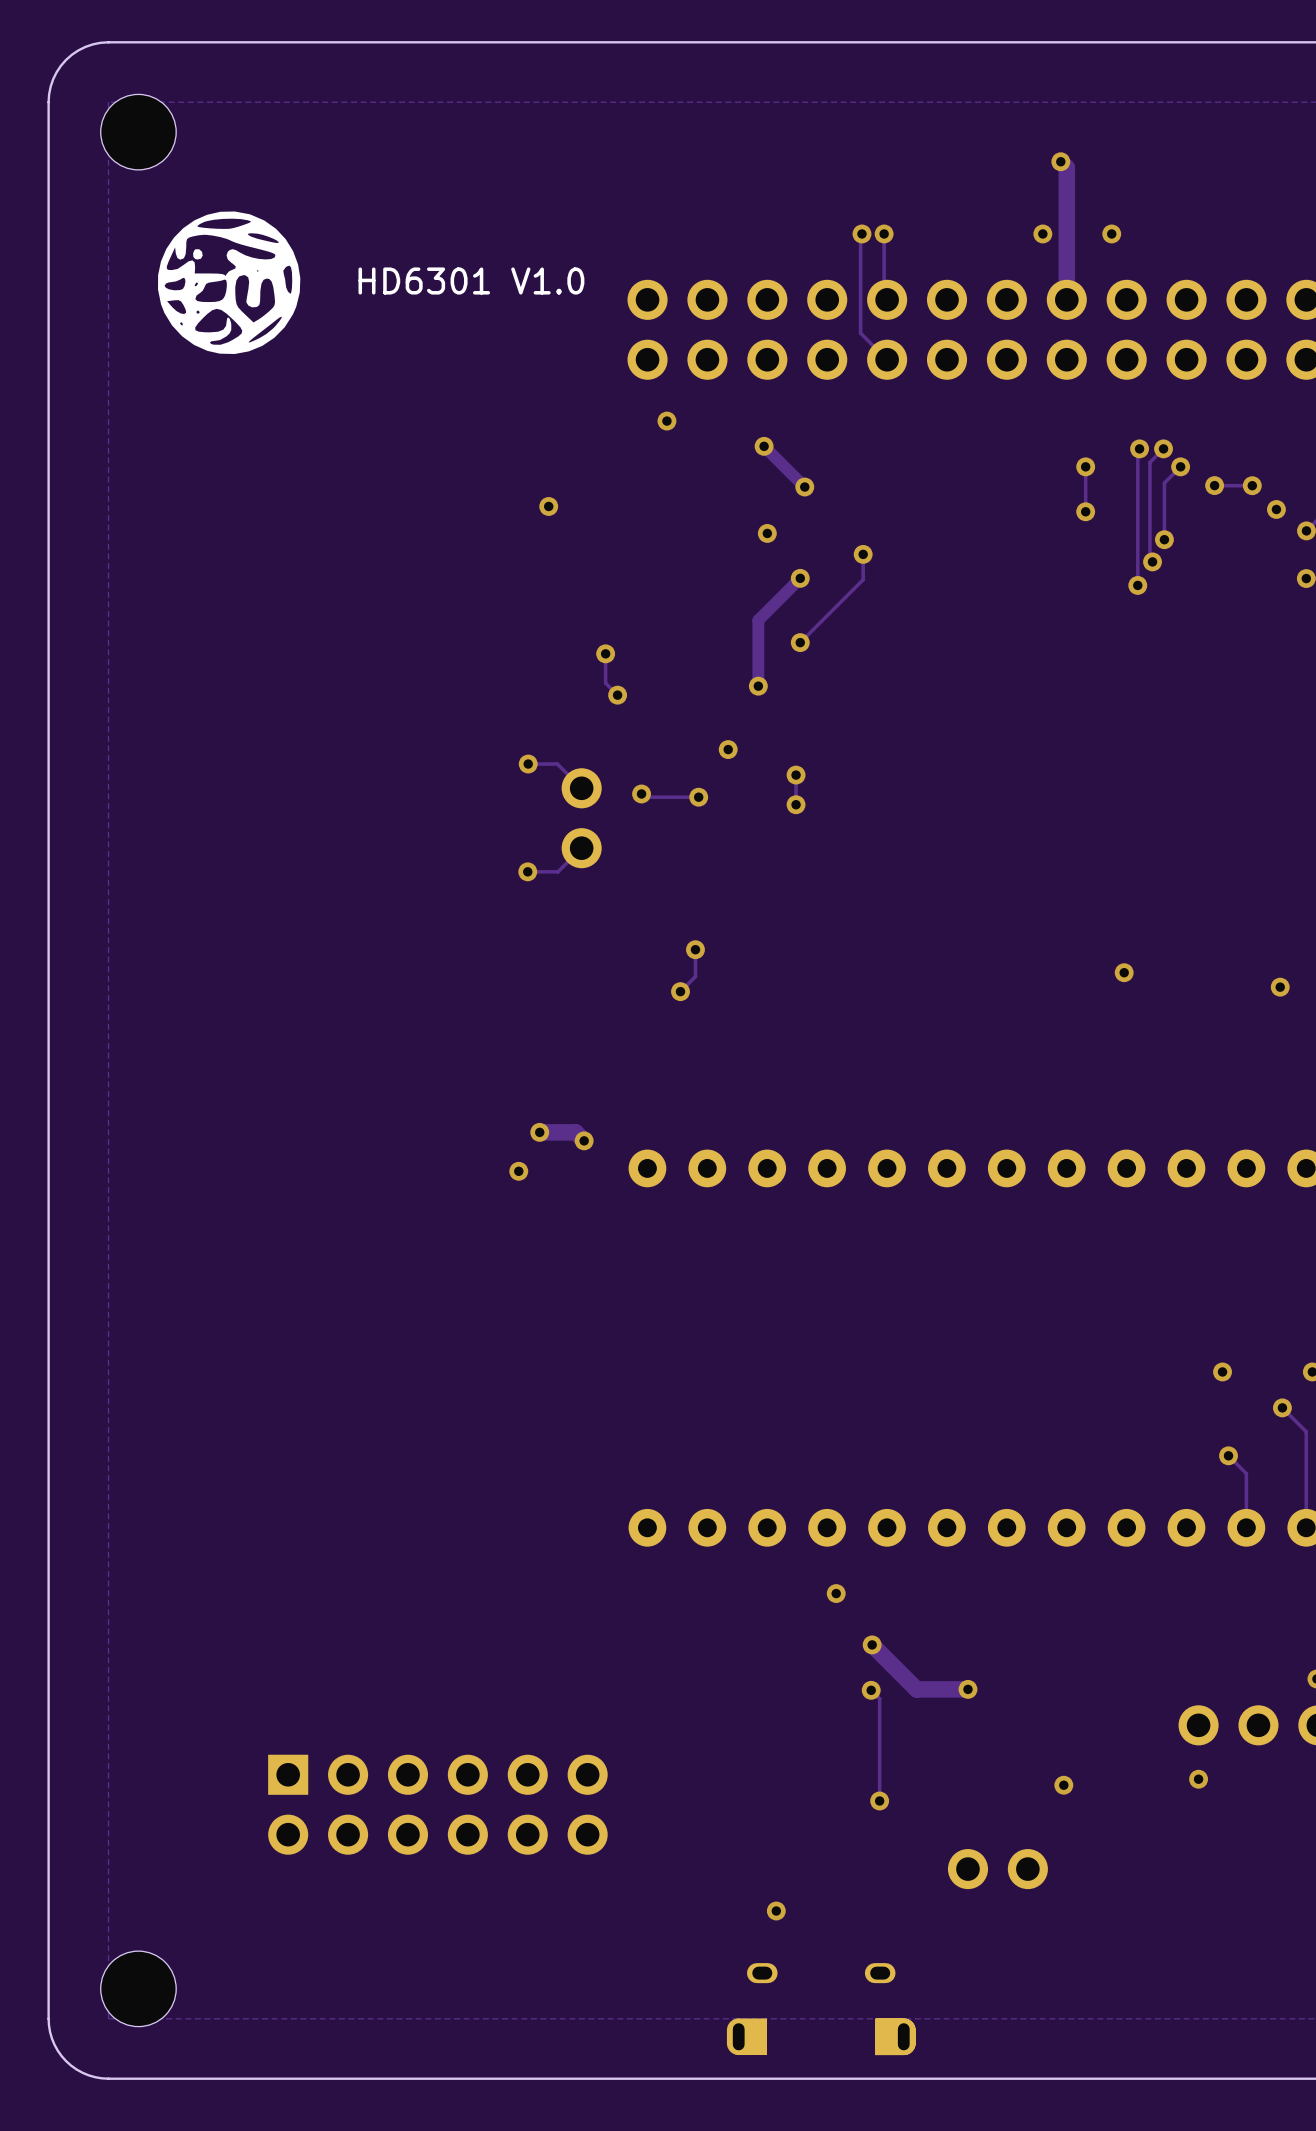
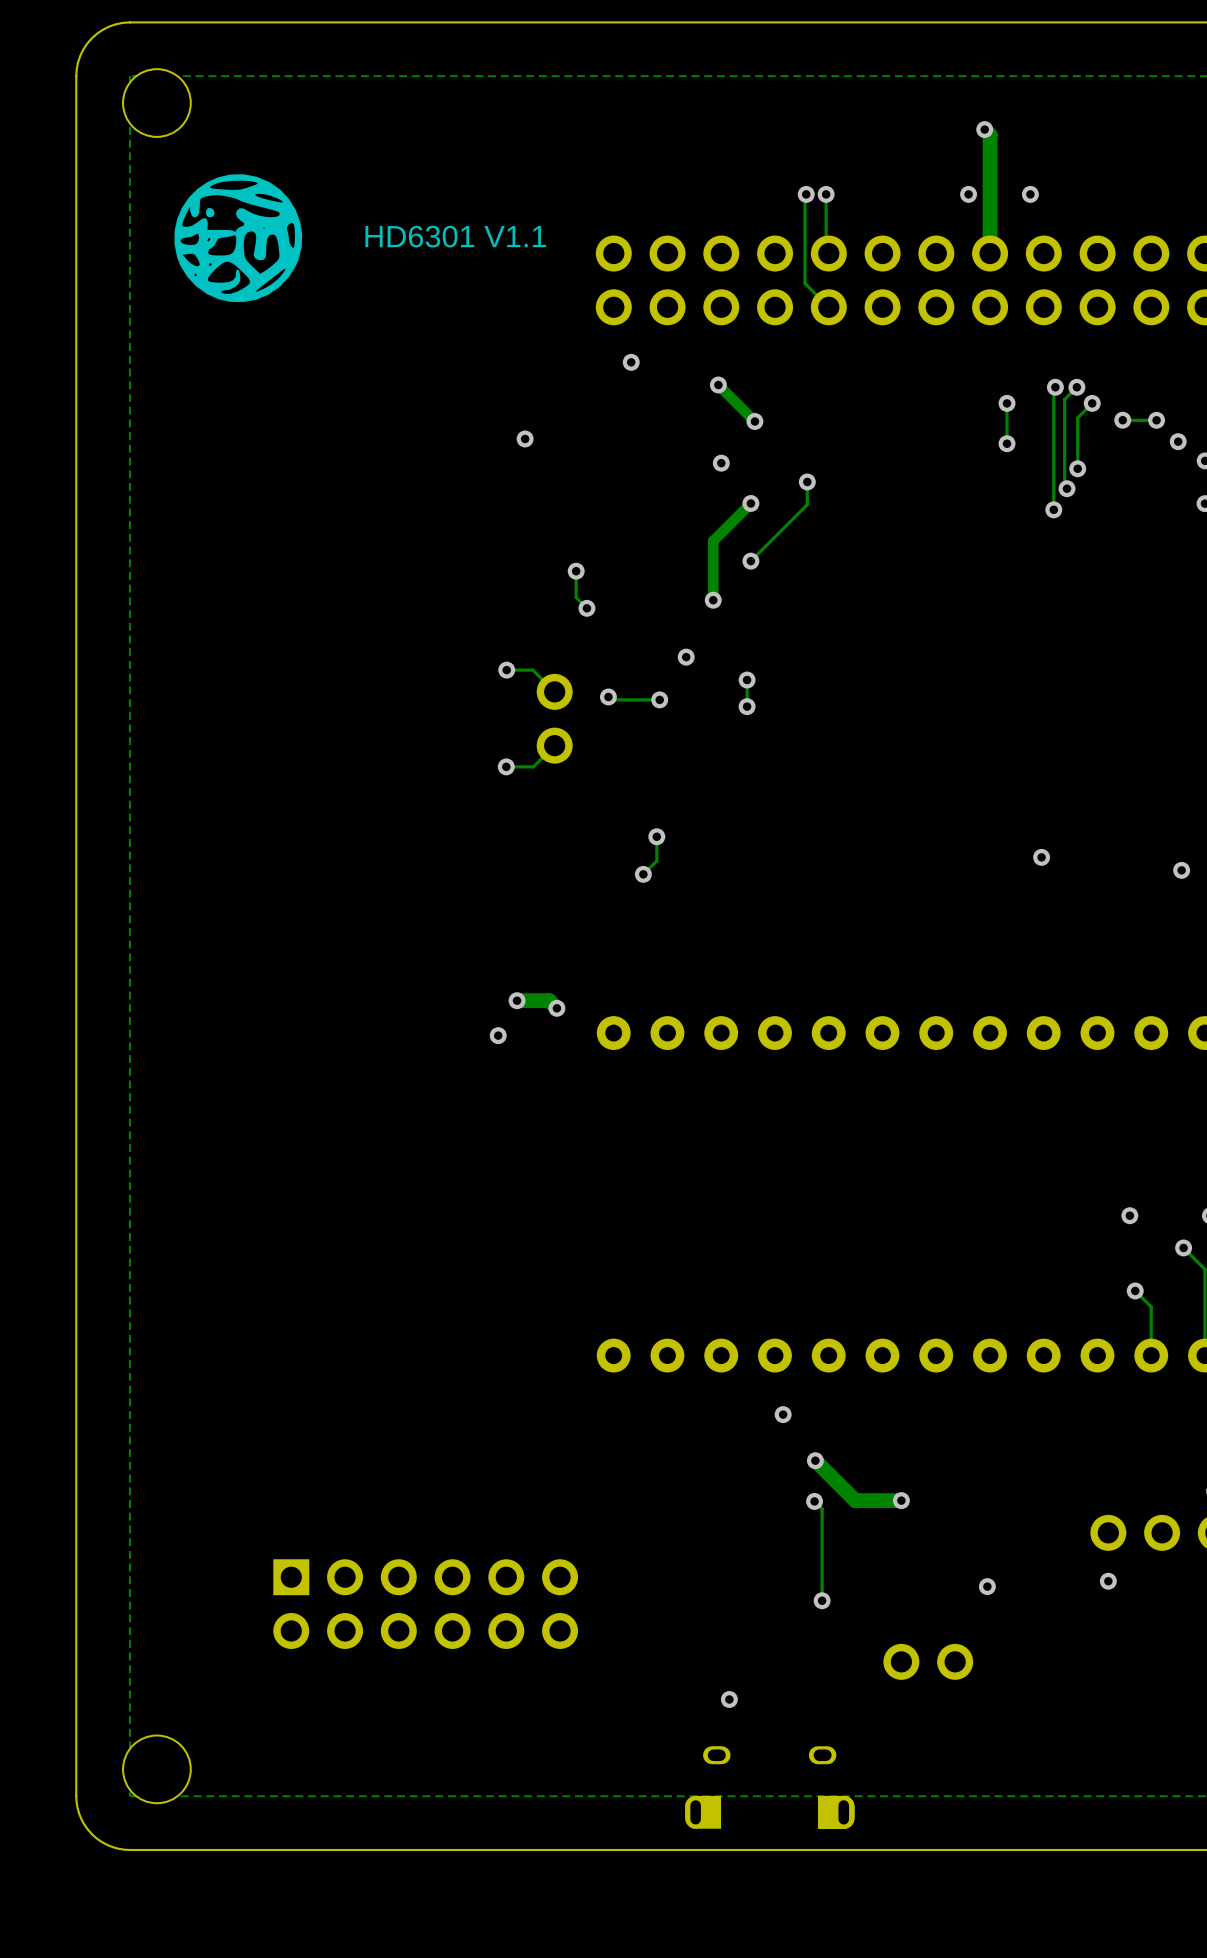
text: HD6301 V1.0 (471, 281) -> HD6301 V1.1 (455, 236)

